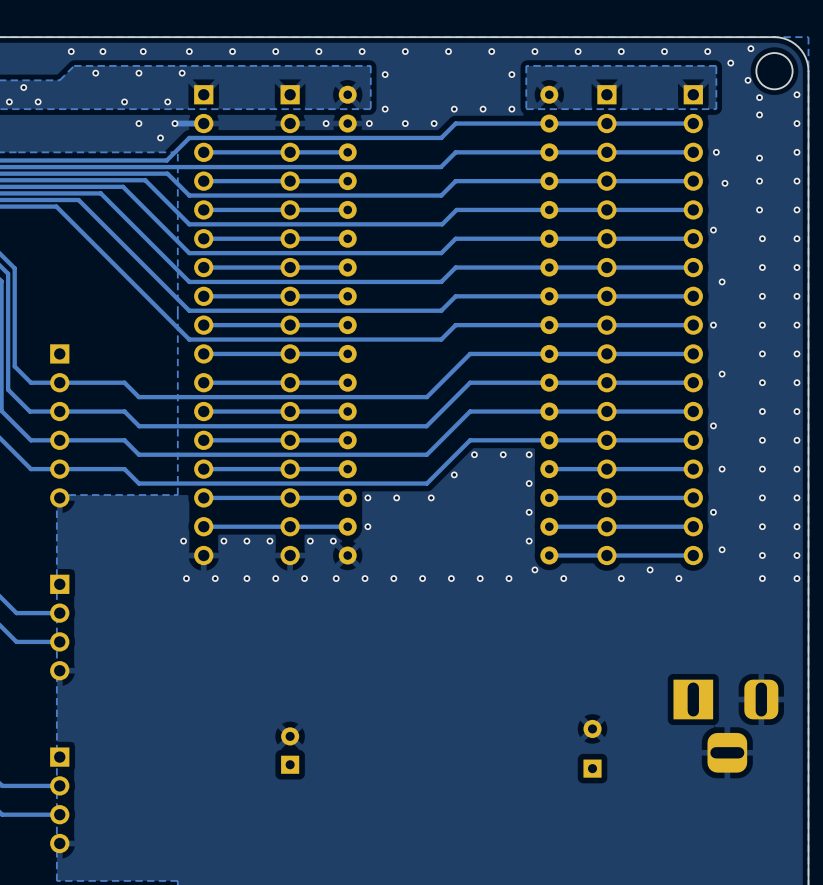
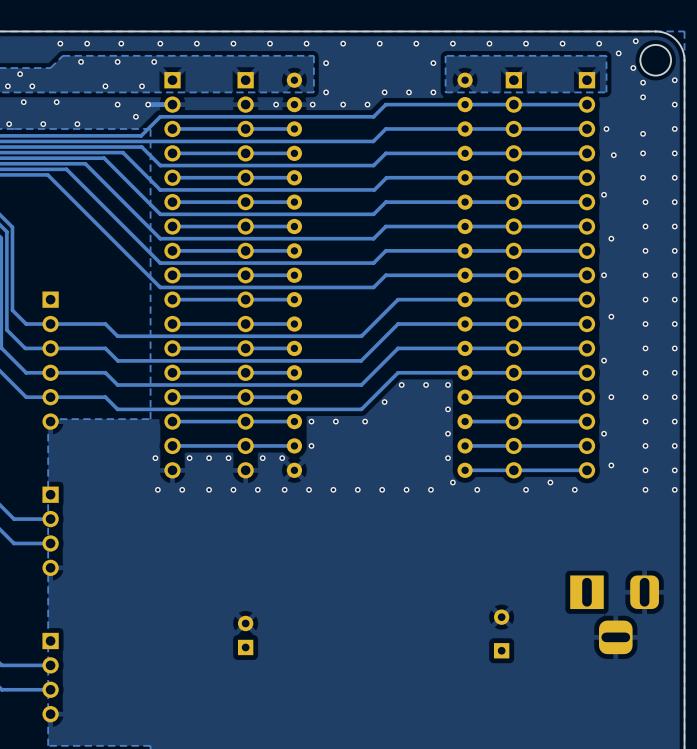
via: none -> (23, 102)
via: none -> (56, 102)
via: none -> (9, 124)
via: none -> (43, 124)
via: none -> (77, 124)

